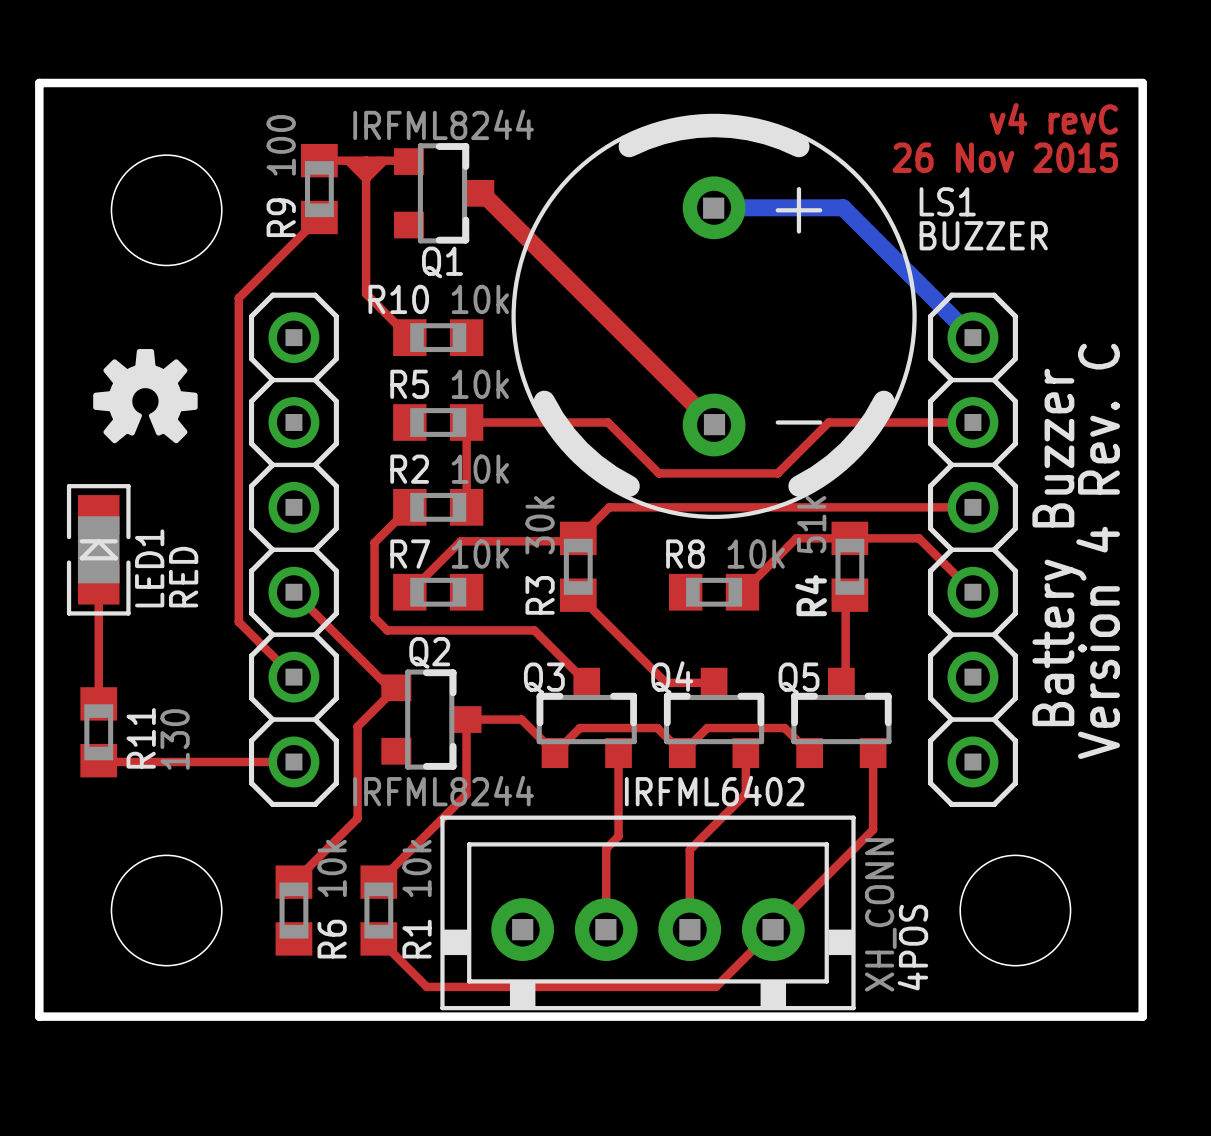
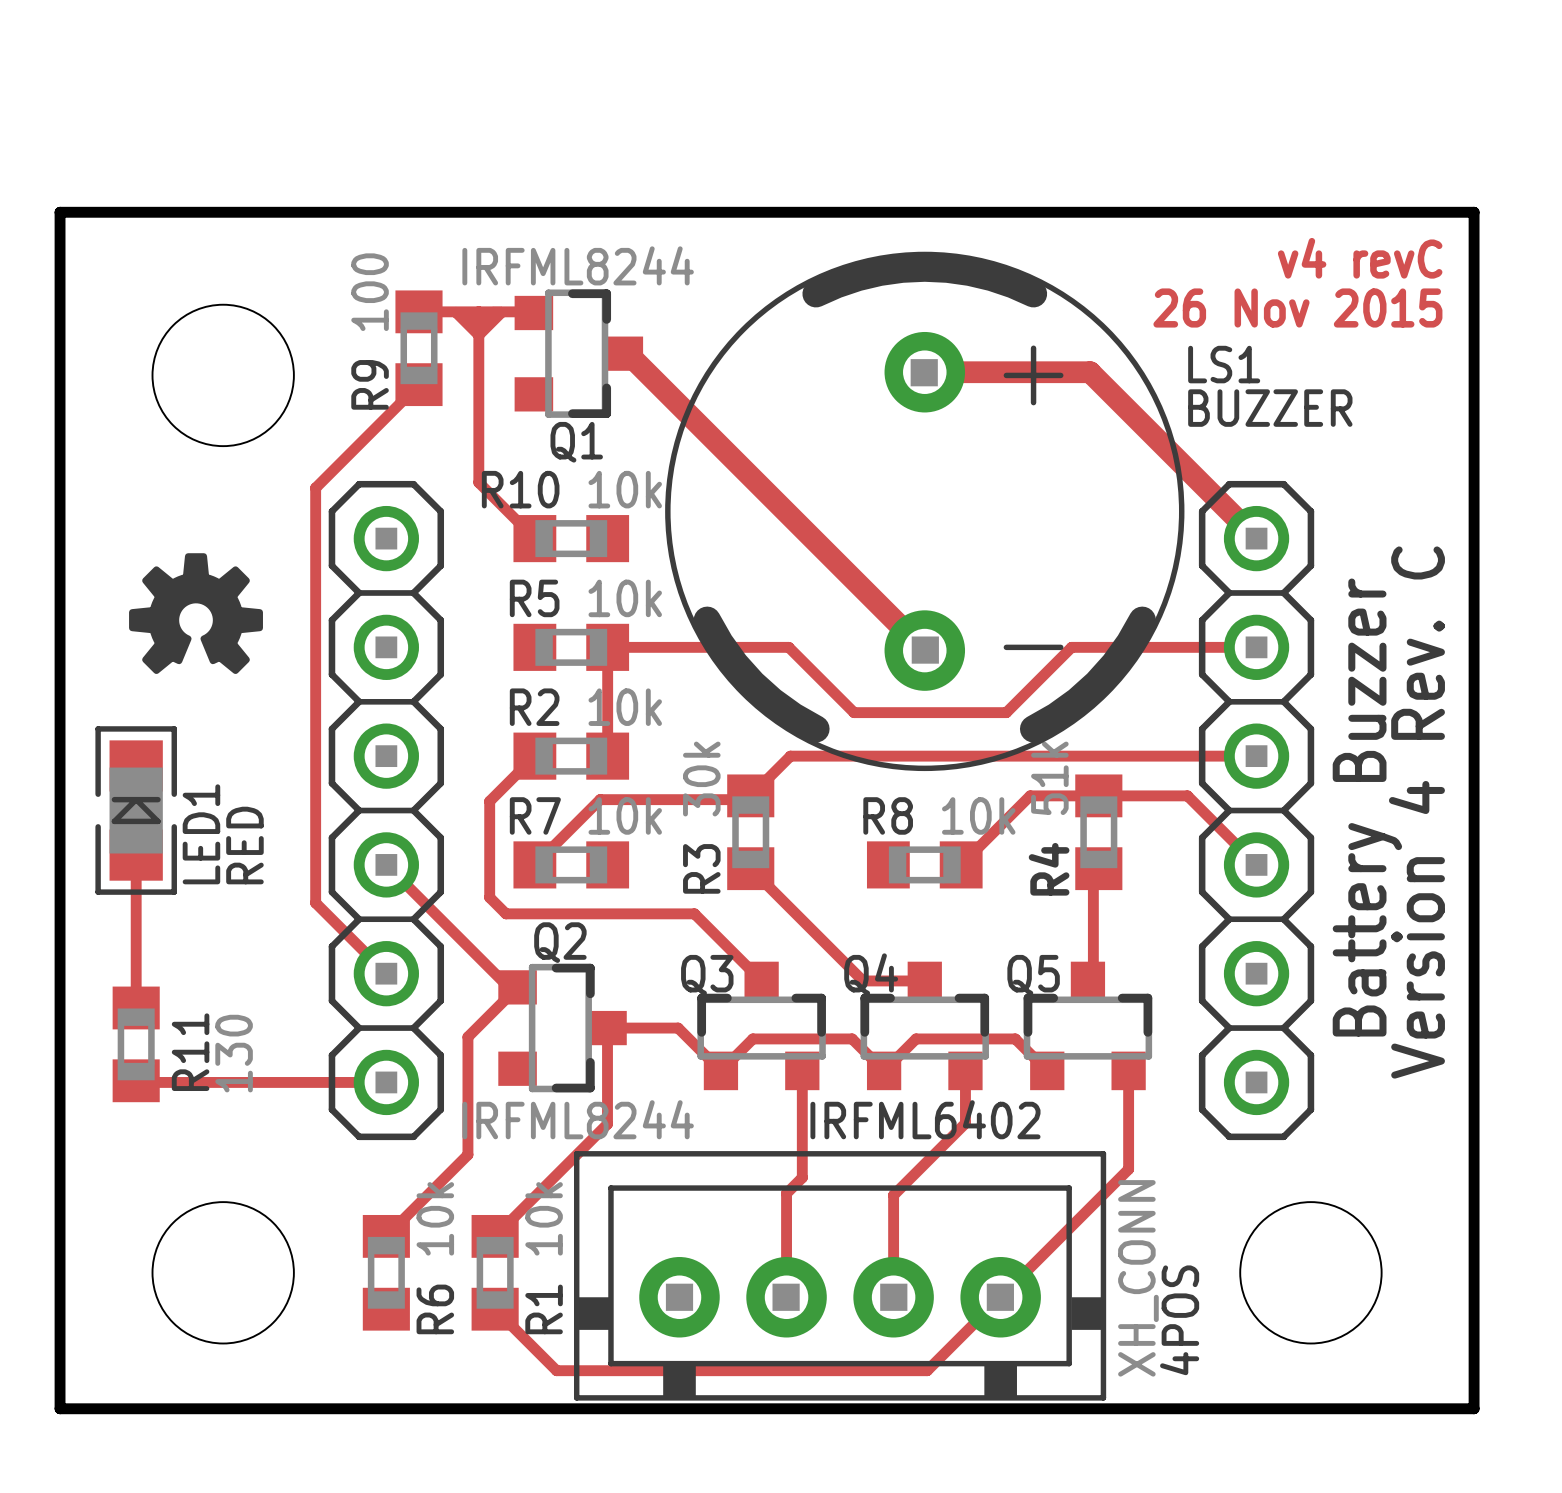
bottom track: (714, 207) (843, 207) (972, 337) -> none
top track: none -> (924, 372) (1090, 372) (1256, 538)

